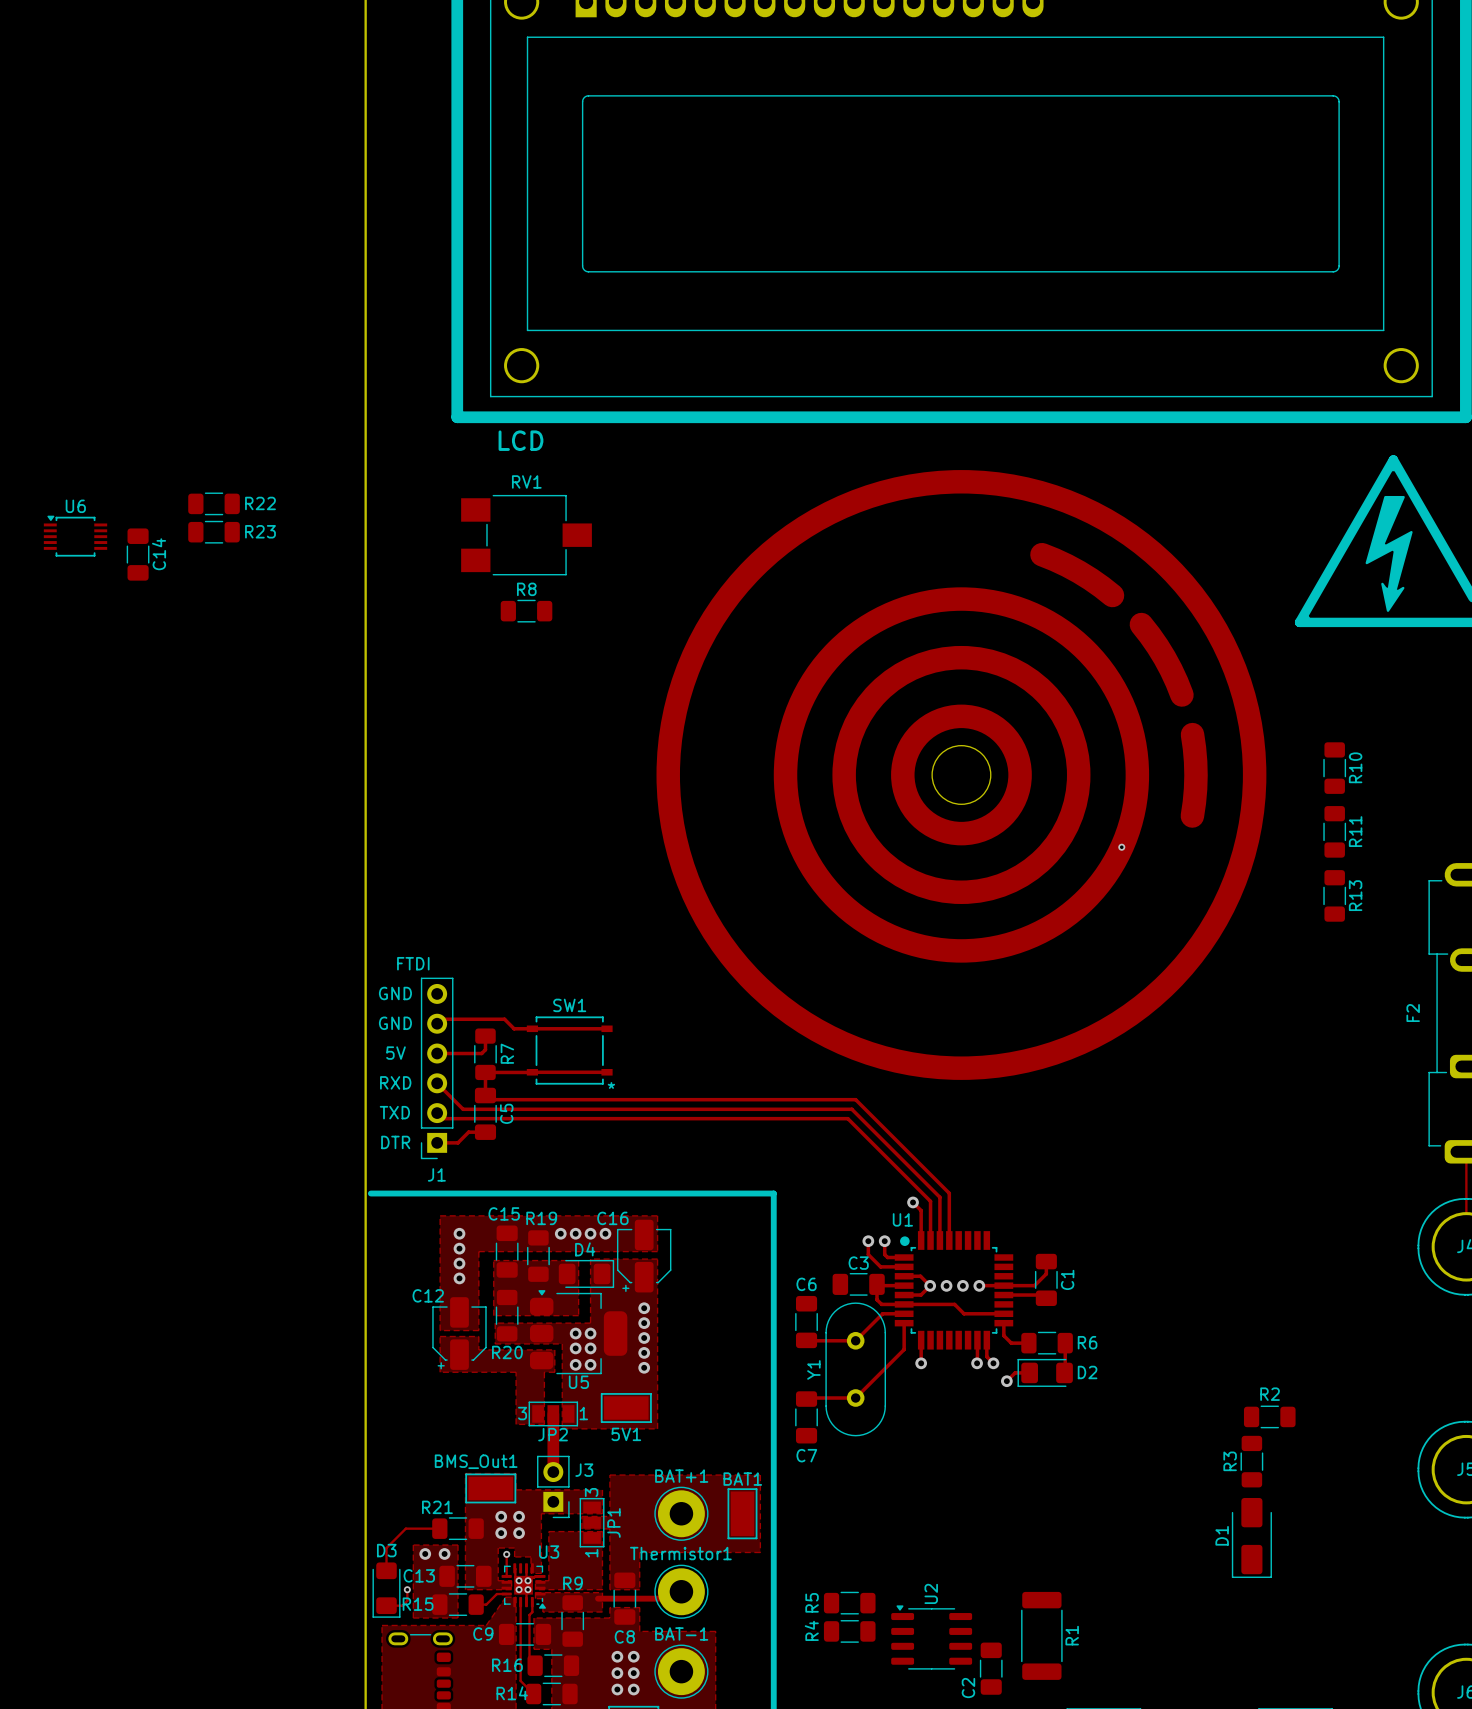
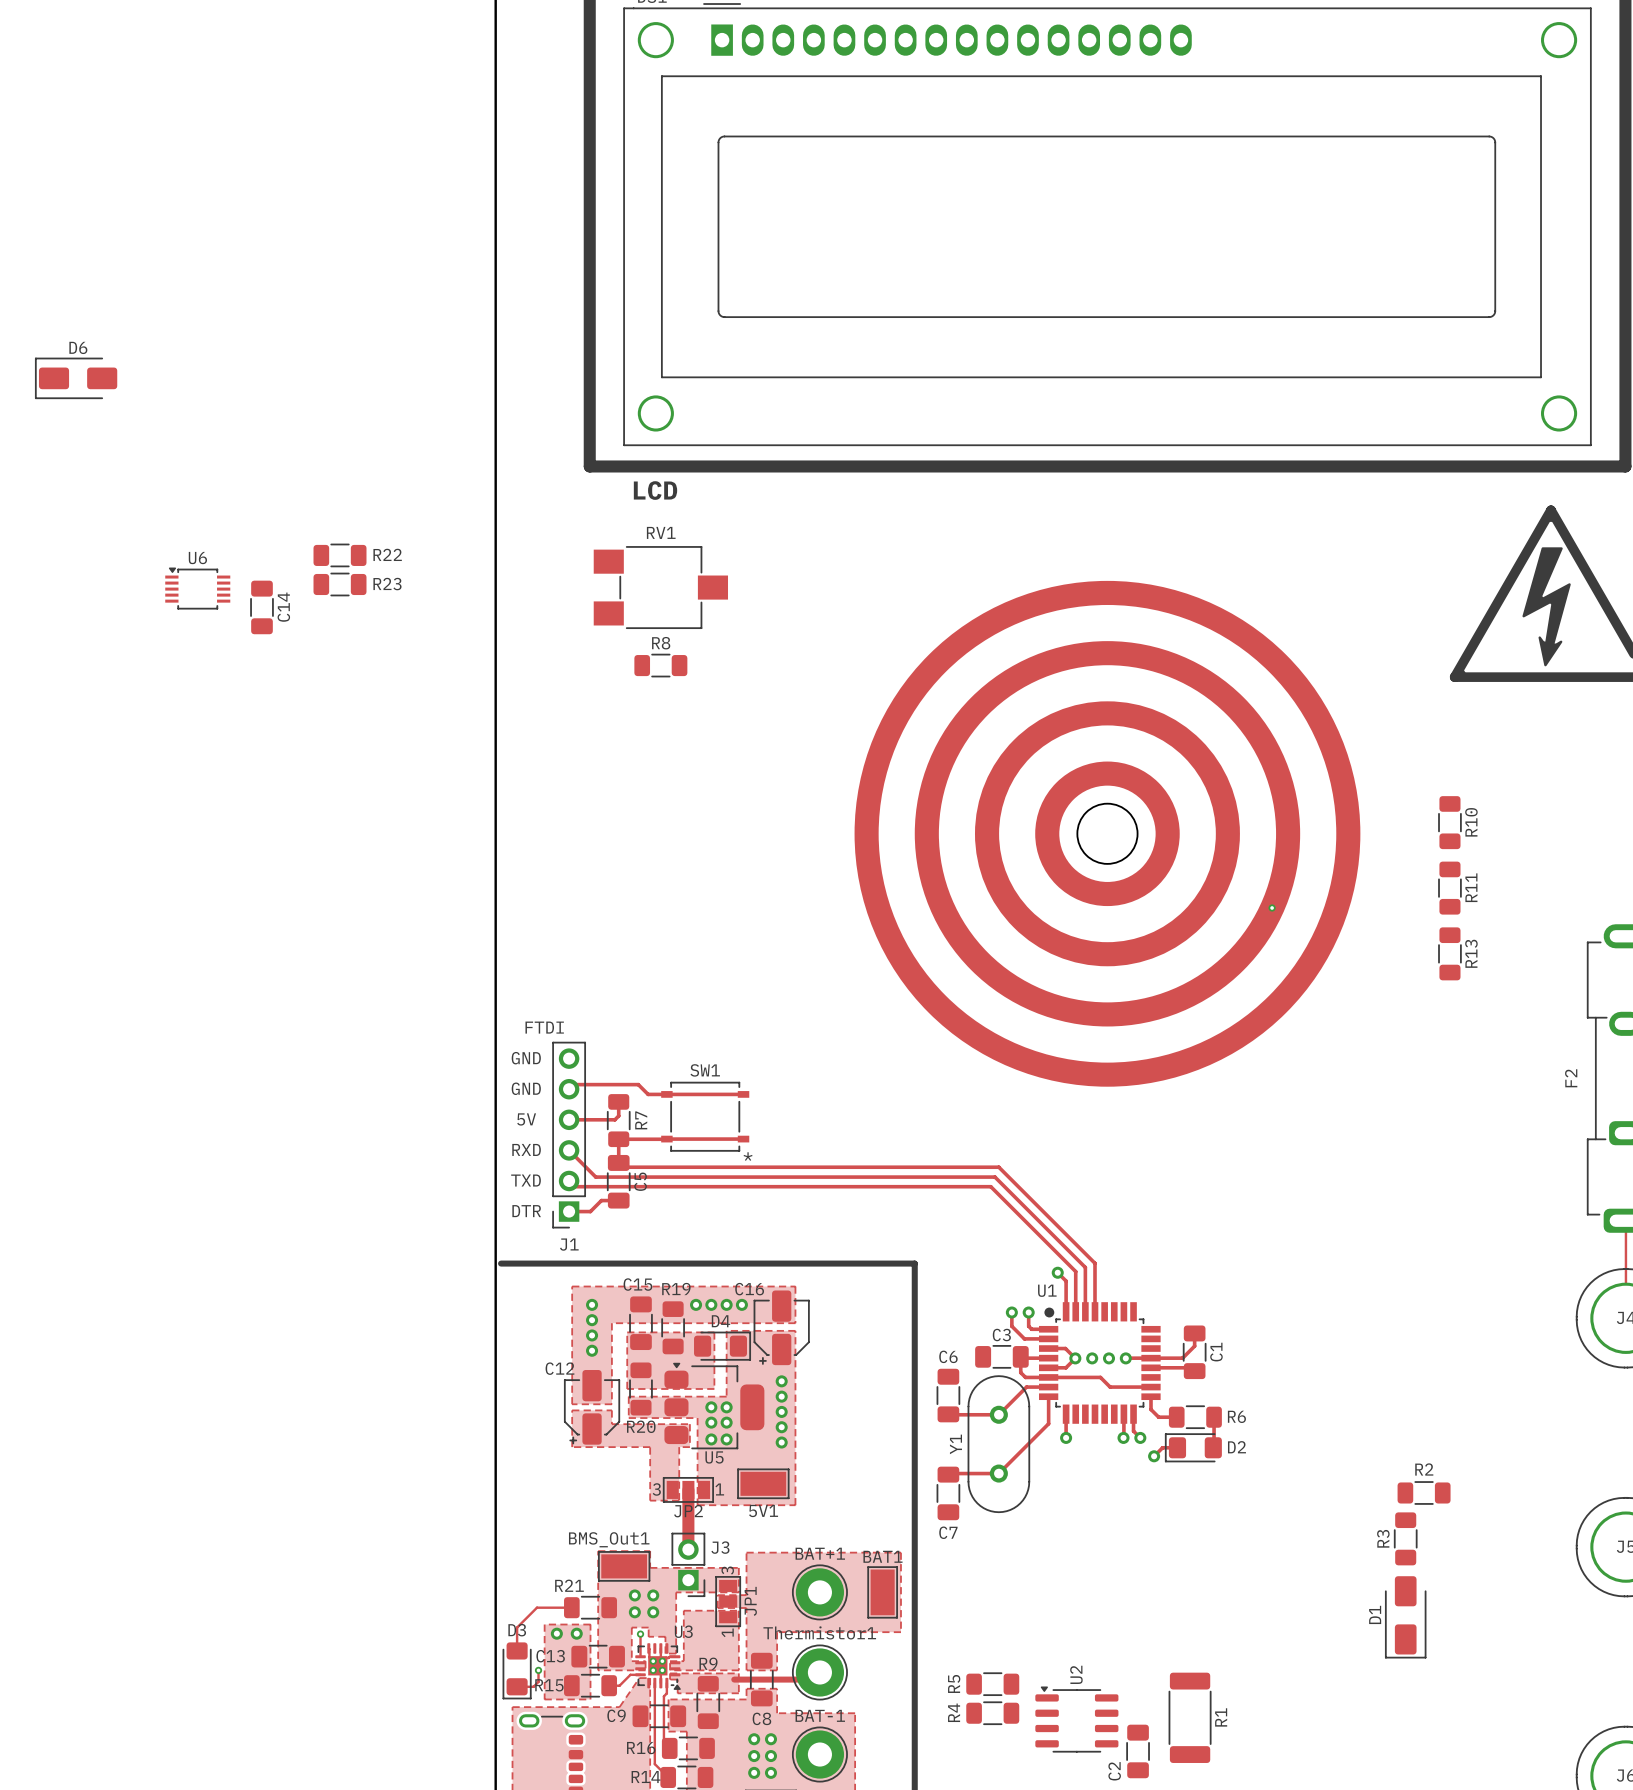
drawing shape: [656, 470, 1267, 1080] -> [854, 580, 1361, 1087]
track: (1041, 554) (1079, 572) (1112, 595) -> none
track: (1141, 624) (1164, 658) (1181, 695) -> none
track: (1192, 734) (1196, 775) (1192, 816) -> none
R10 position: (1334, 768) -> (1449, 822)
R11 position: (1334, 831) -> (1449, 888)
R13 position: (1334, 895) -> (1449, 953)

